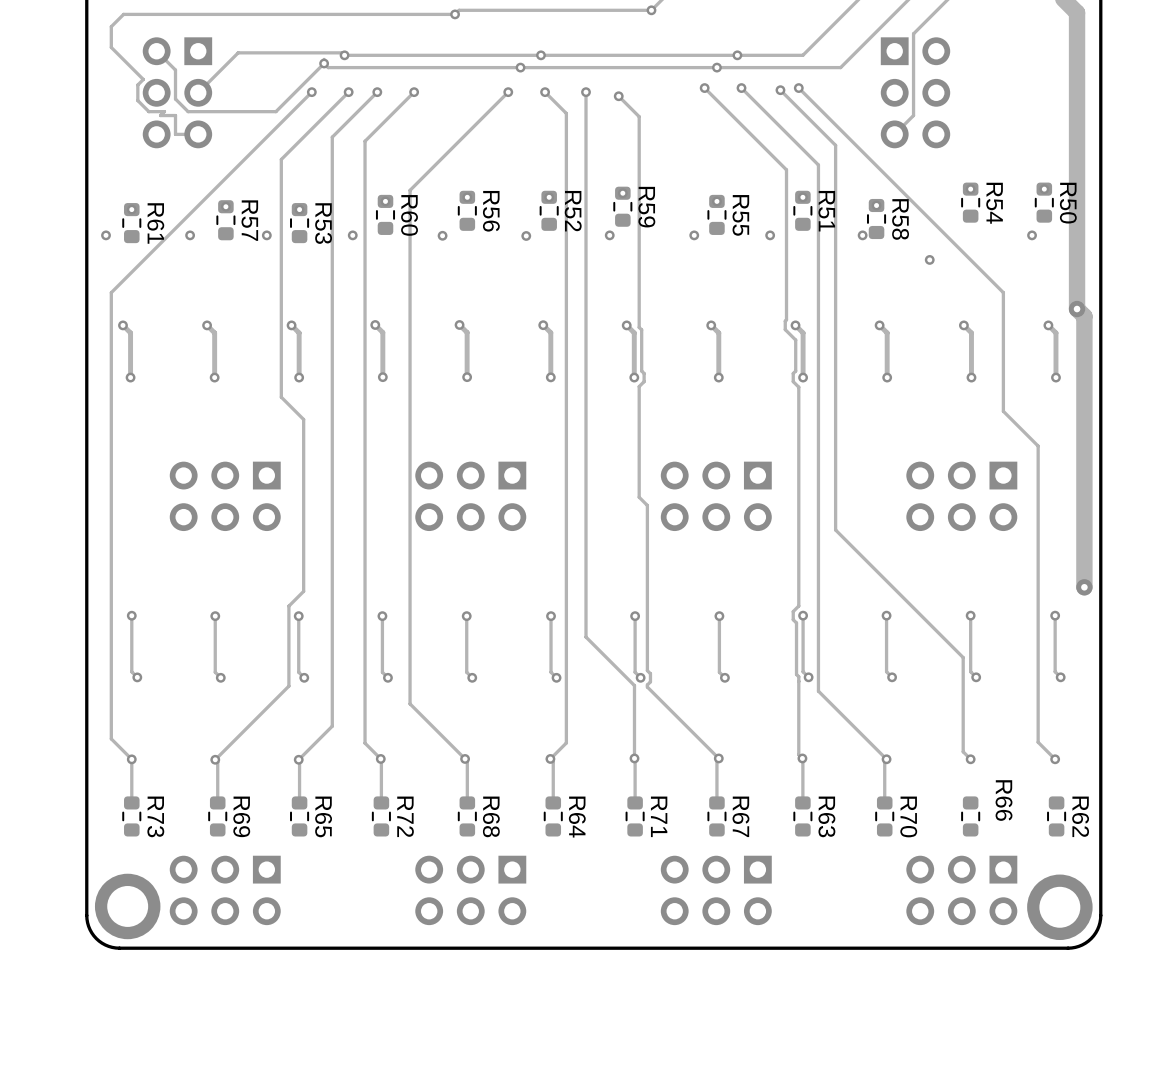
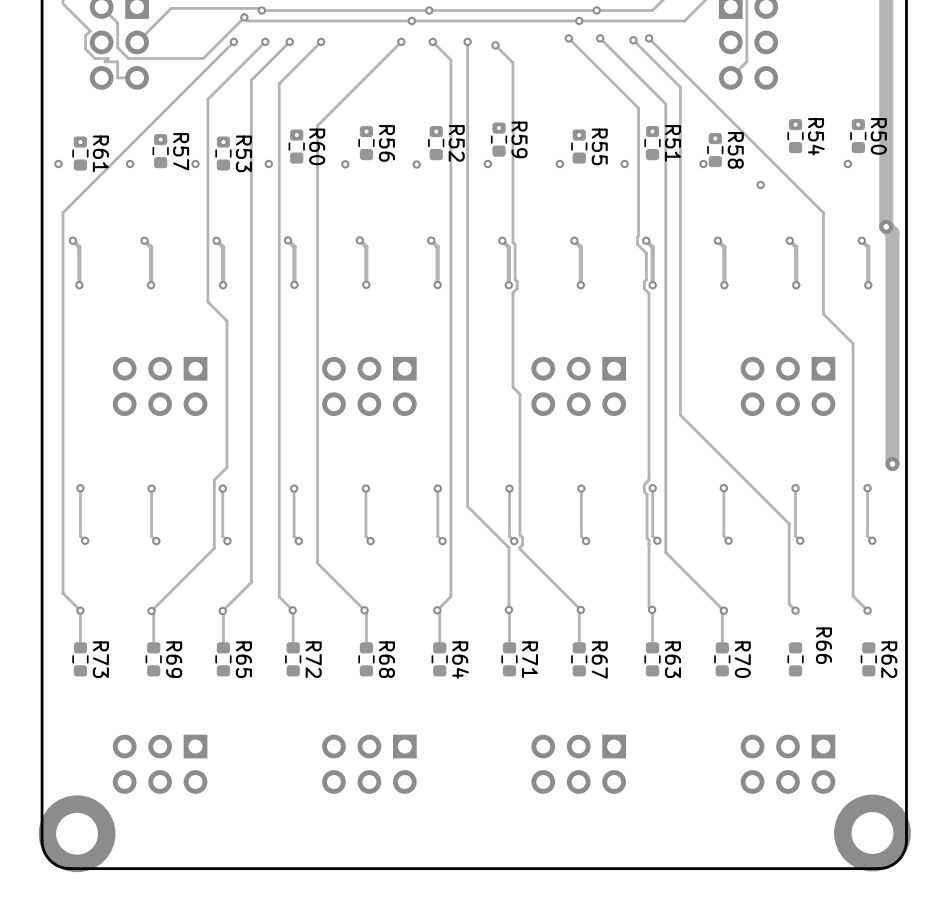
part position: (225, 890) -> (160, 764)
part position: (470, 890) -> (369, 764)
part position: (716, 890) -> (578, 764)
part position: (961, 890) -> (788, 764)
via: (127, 906) -> none
via: (1059, 907) -> none
board edge: (1100, 915) (1097, 929) (1091, 938) (1082, 944) (1068, 948) (119, 948) (108, 946) (96, 938) (90, 929) (86, 915) -> (906, 743) (905, 846) (902, 855) (895, 862) (887, 867) (878, 868) (66, 868) (52, 862) (46, 855) (42, 846) (42, 743)
via: none -> (872, 833)
via: none -> (77, 833)

